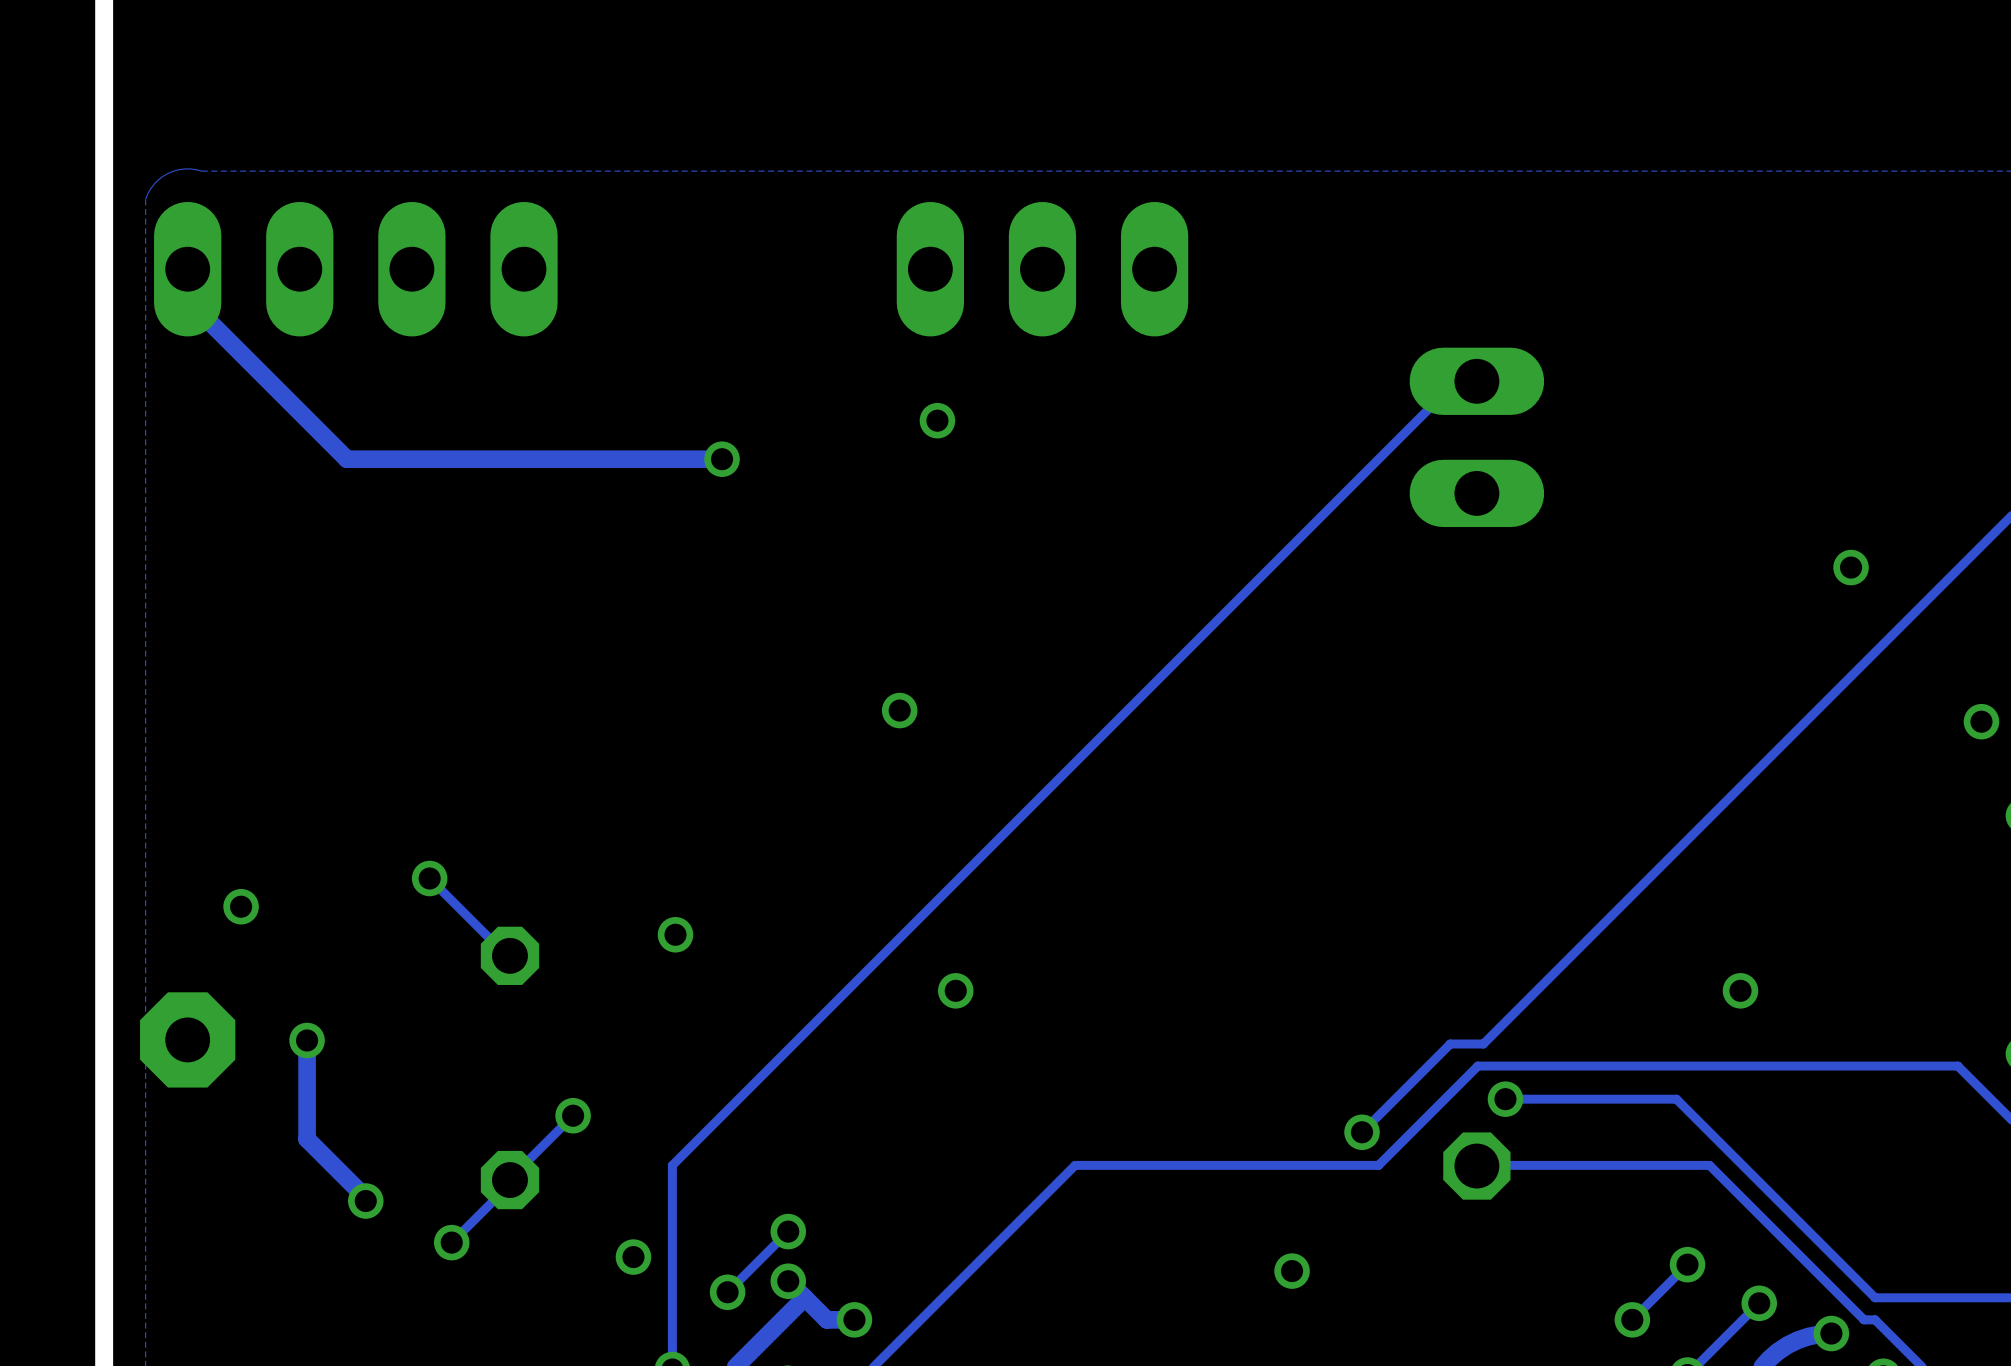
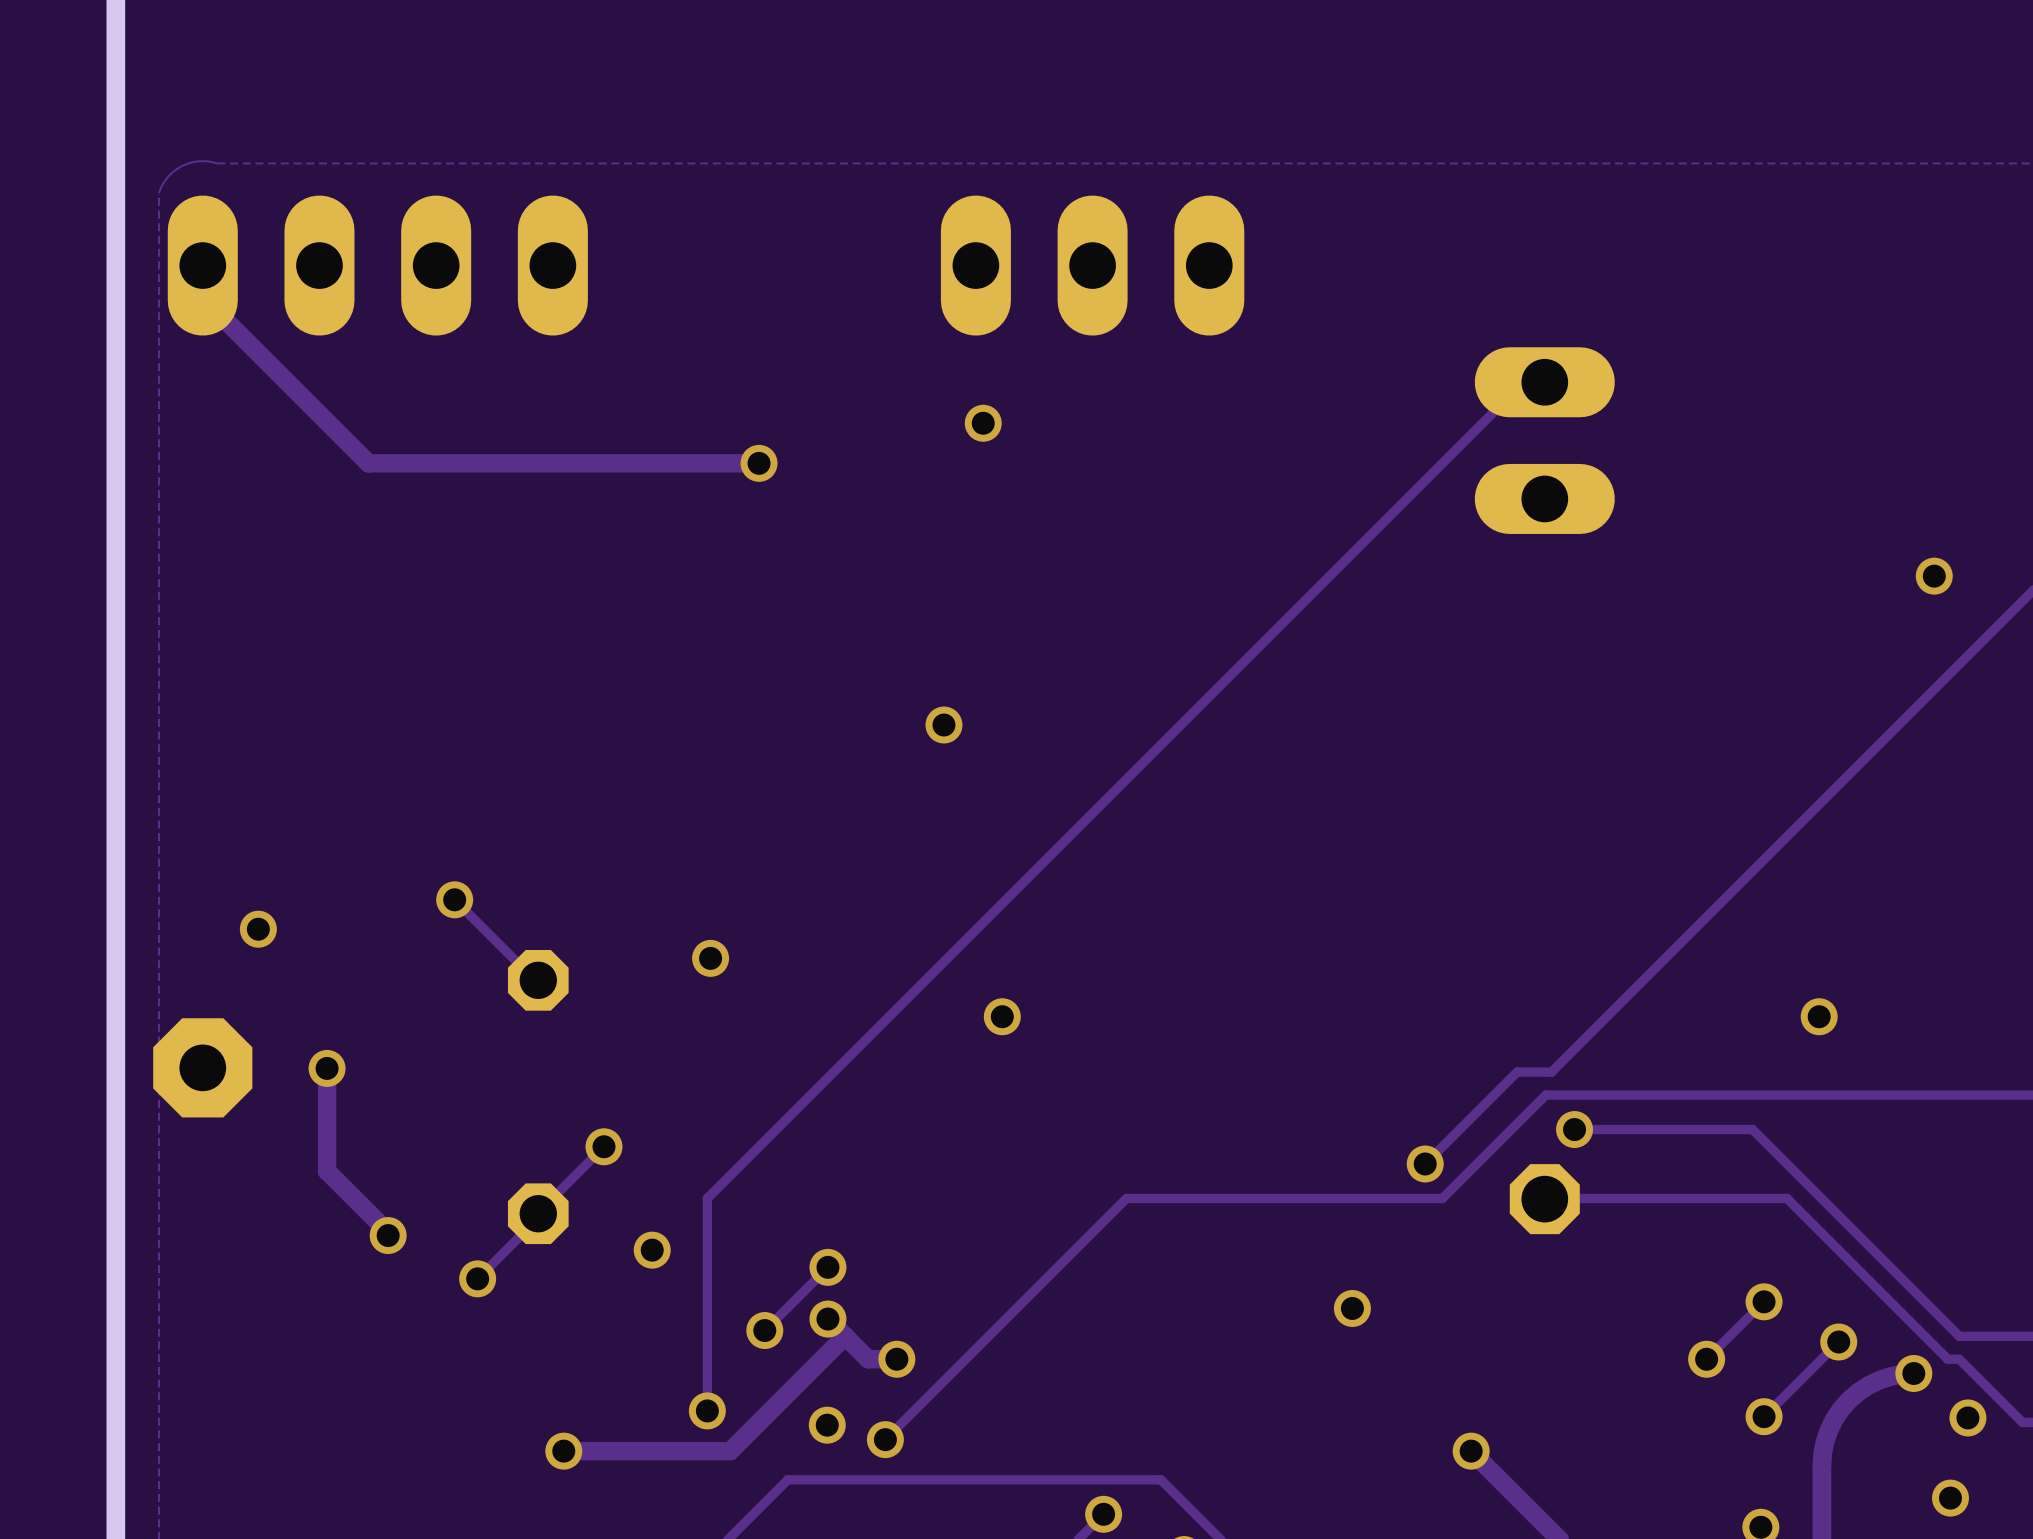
via position: (633, 1257) -> (652, 1250)

